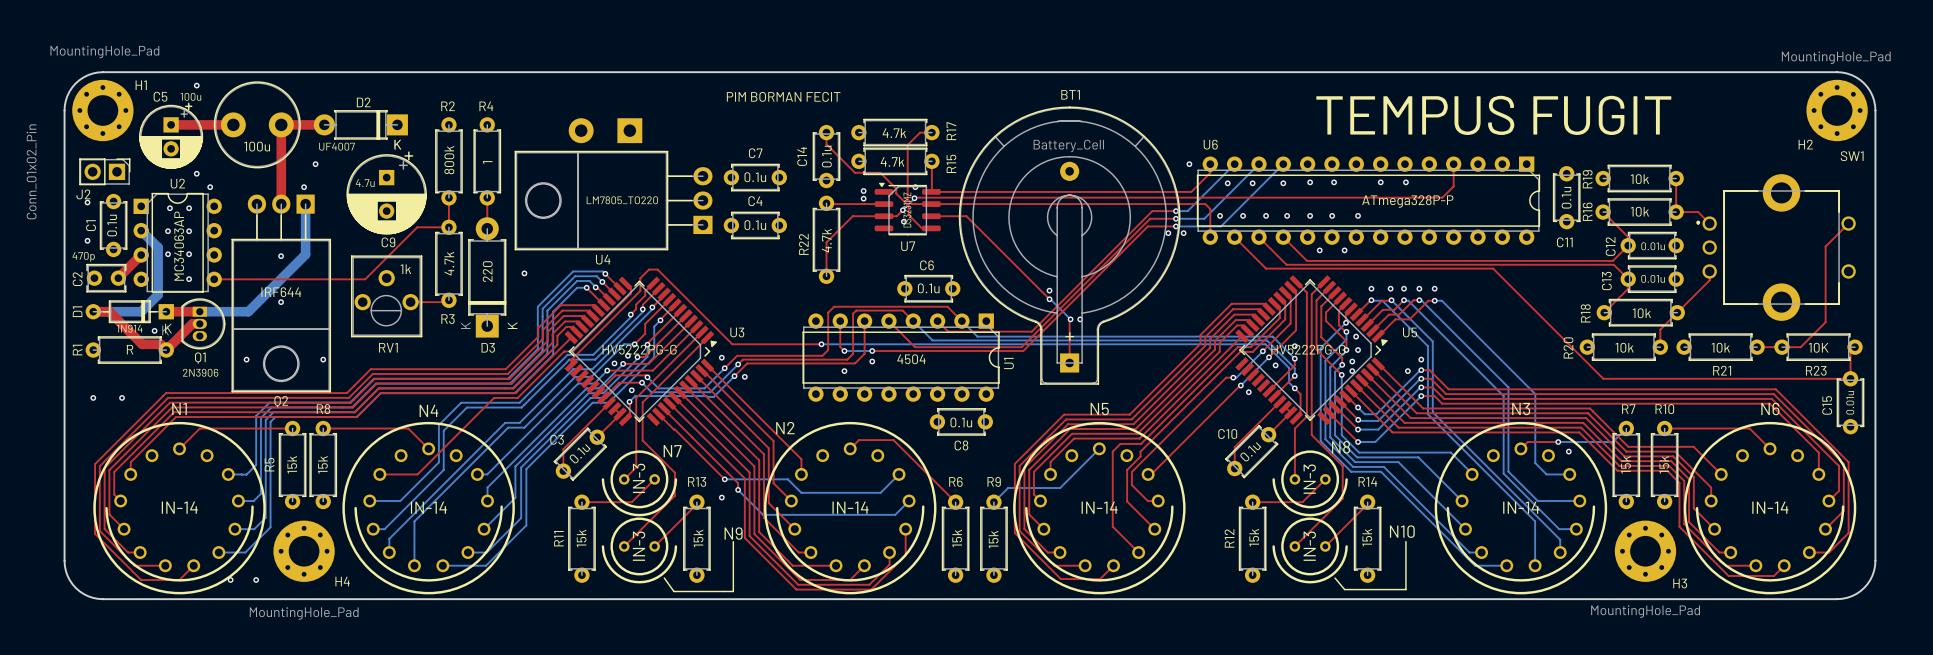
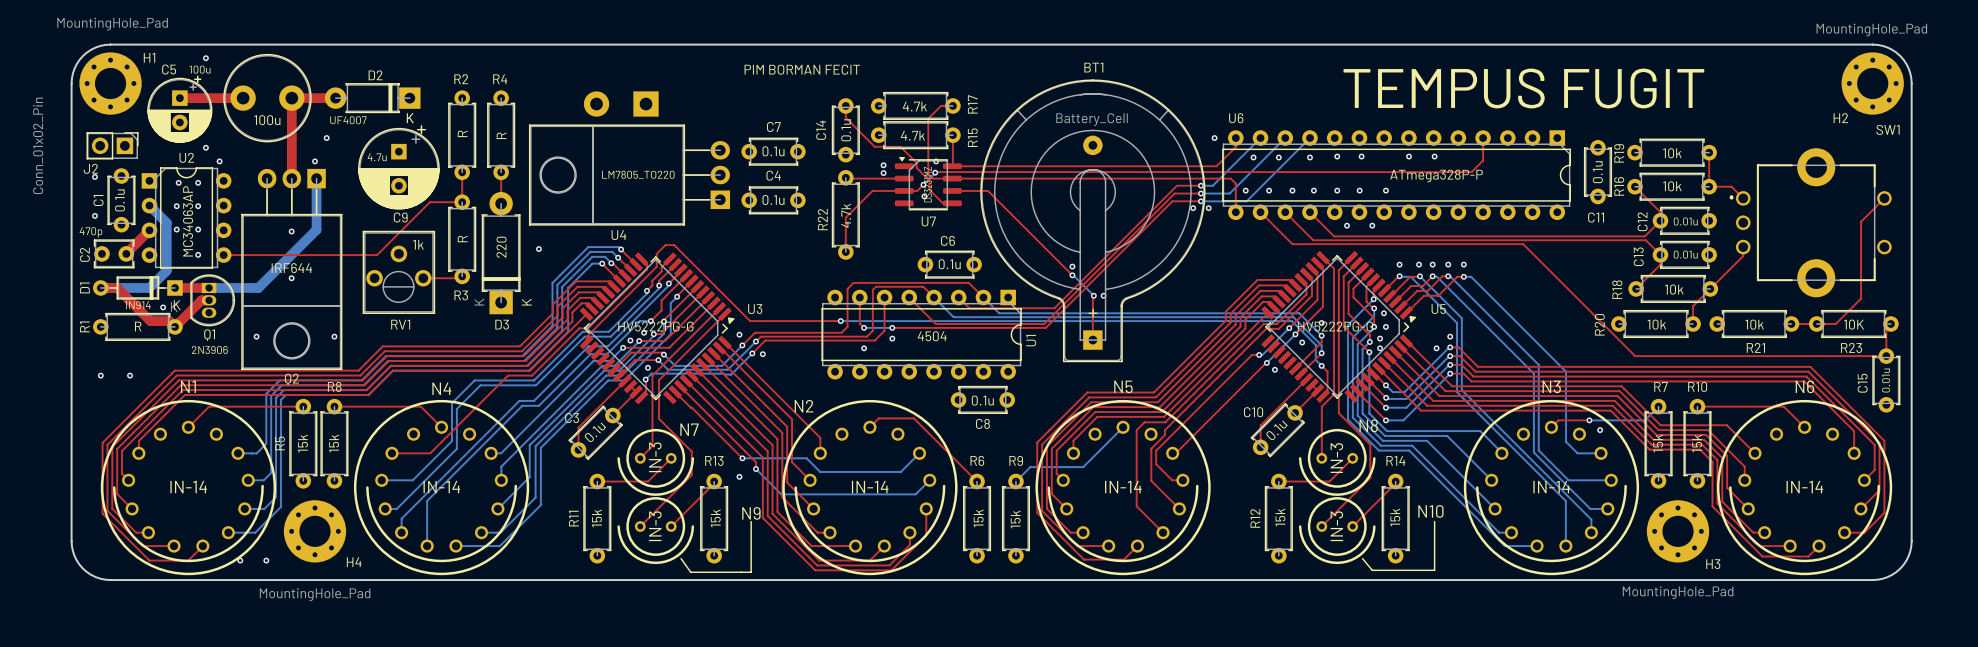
R2 value: 800k (449, 160) -> R (462, 133)
R4 value: 1 (487, 162) -> R (501, 135)
R3 value: 4.7k (449, 263) -> R (462, 238)

